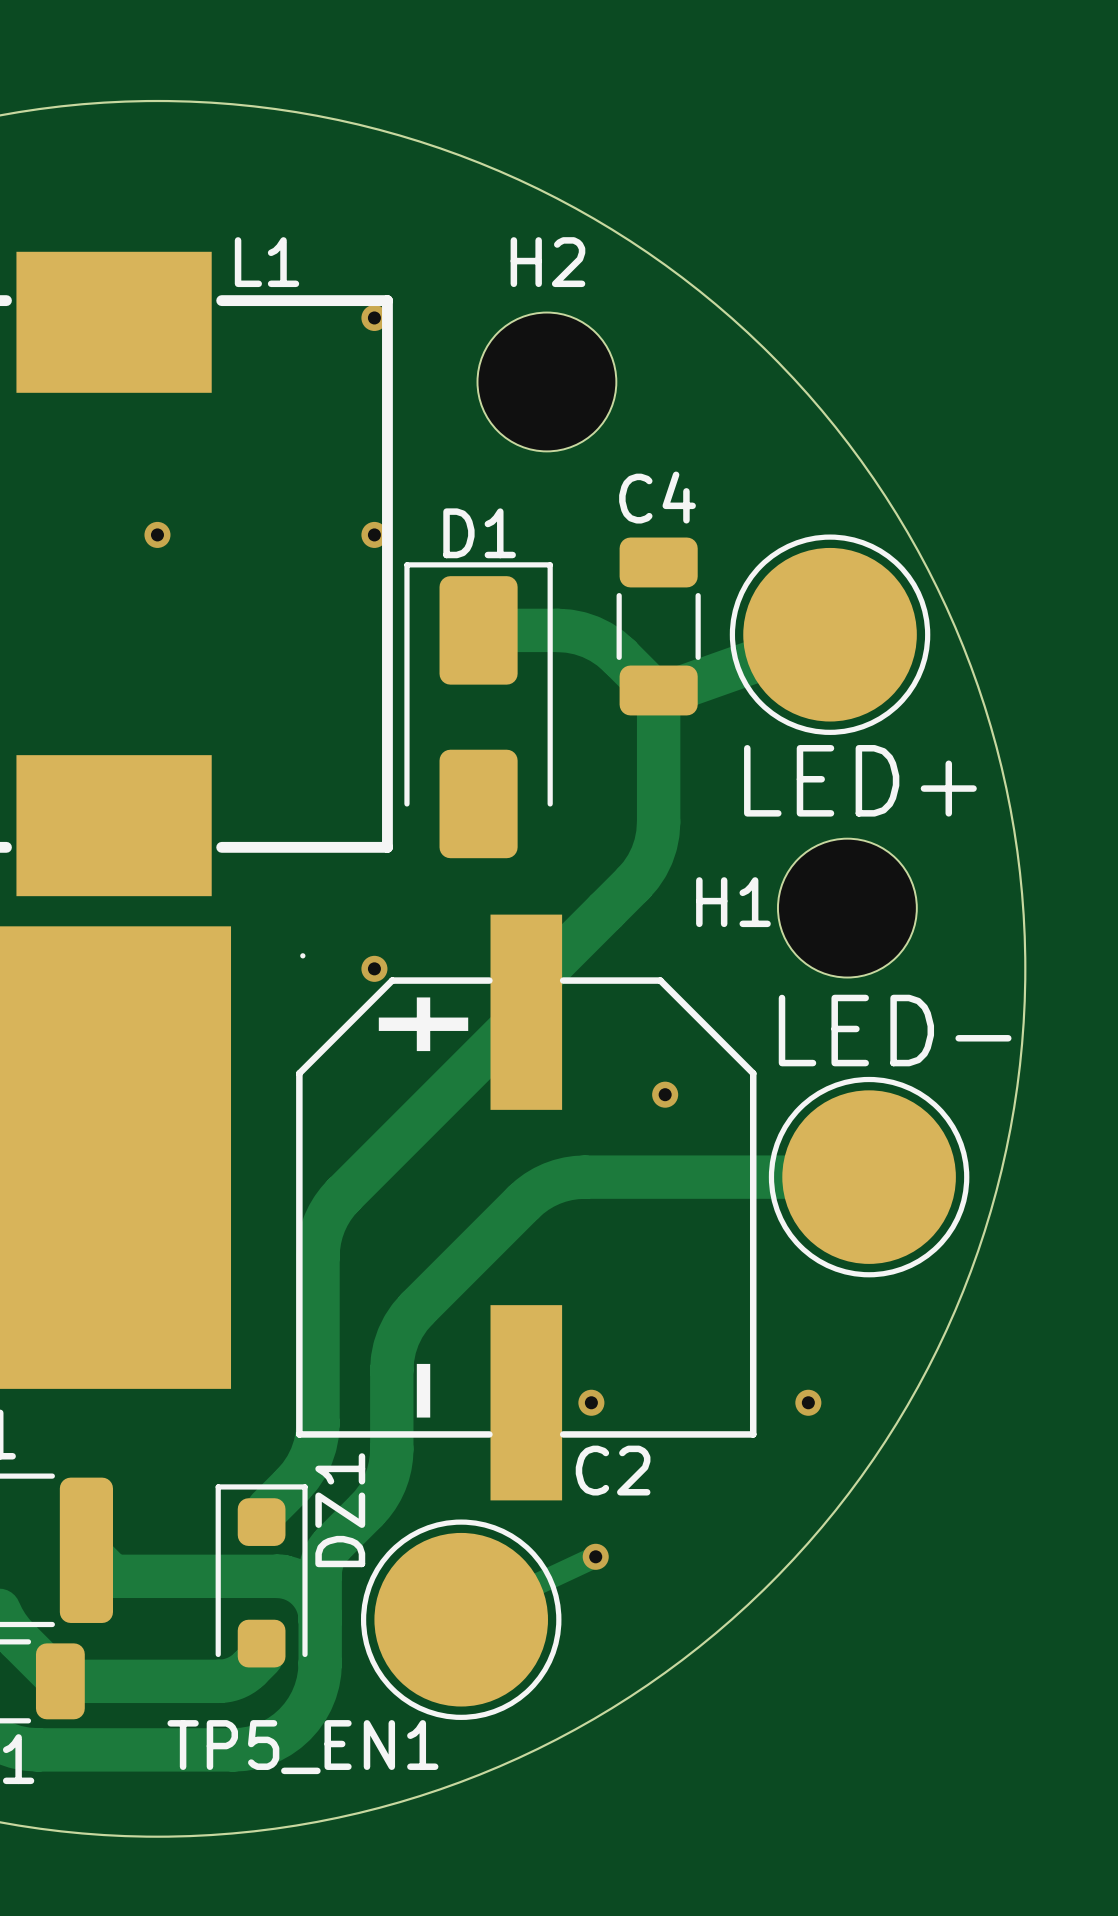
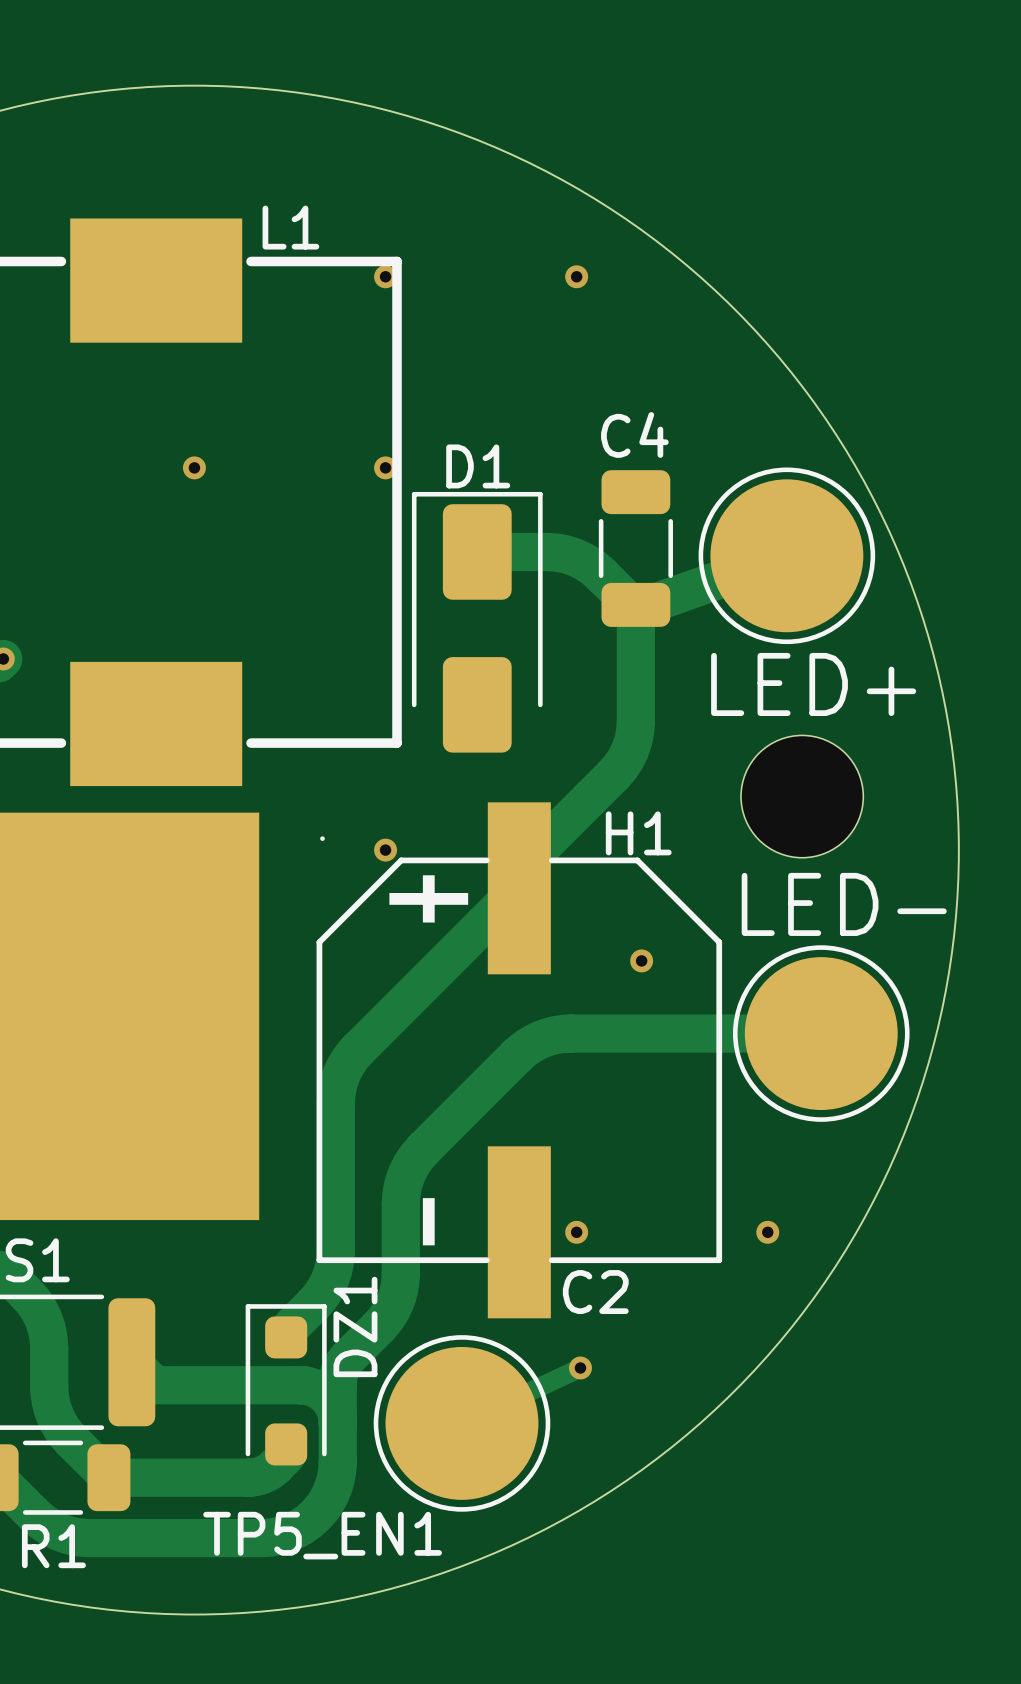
via: none -> (576, 276)
H2: (546, 381) -> none
H1 name position: H1 (733, 902) -> H1 (638, 833)

